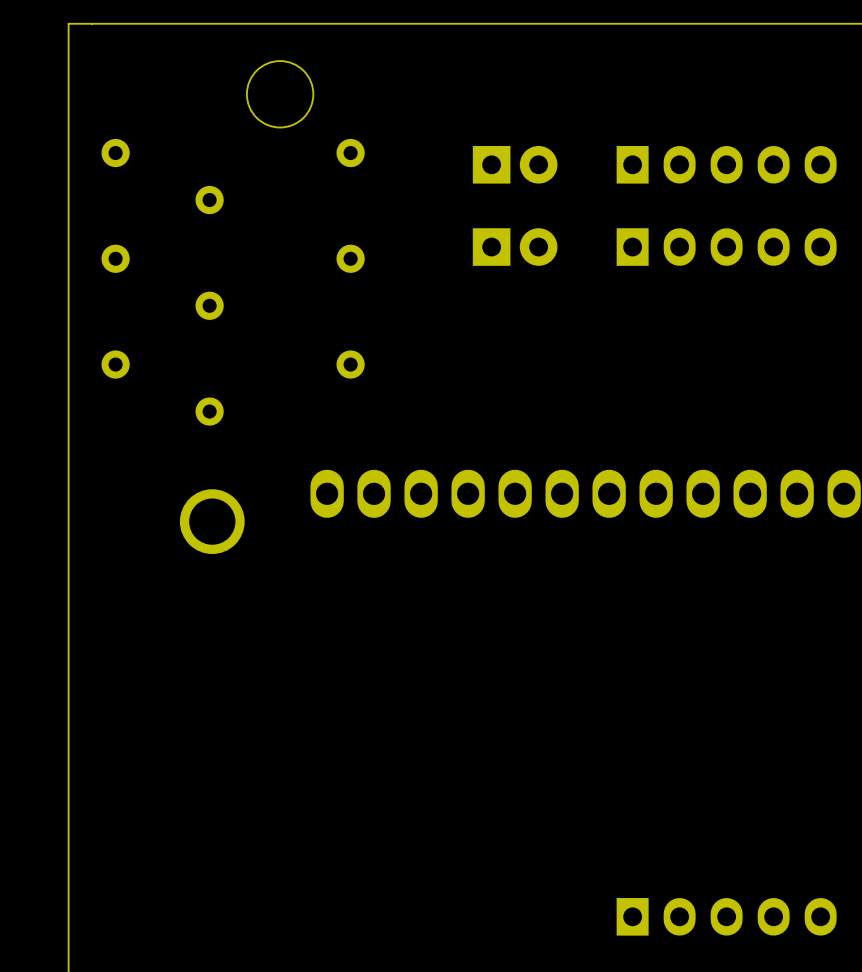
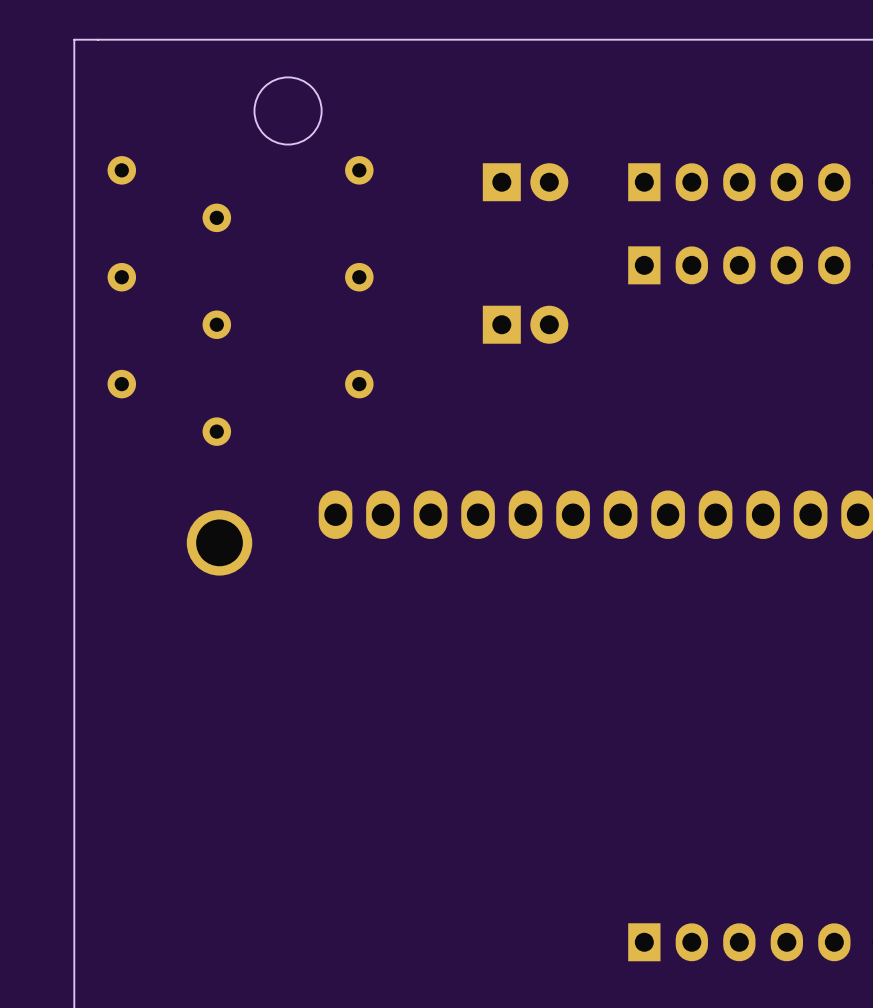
part position: (515, 247) -> (525, 324)

